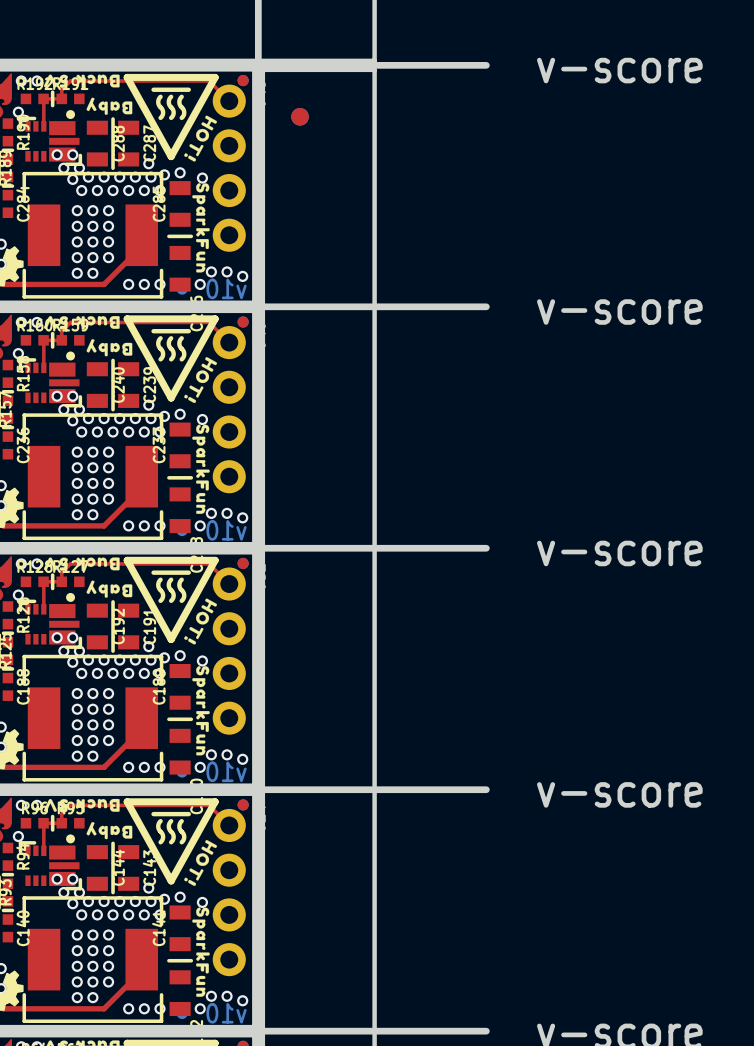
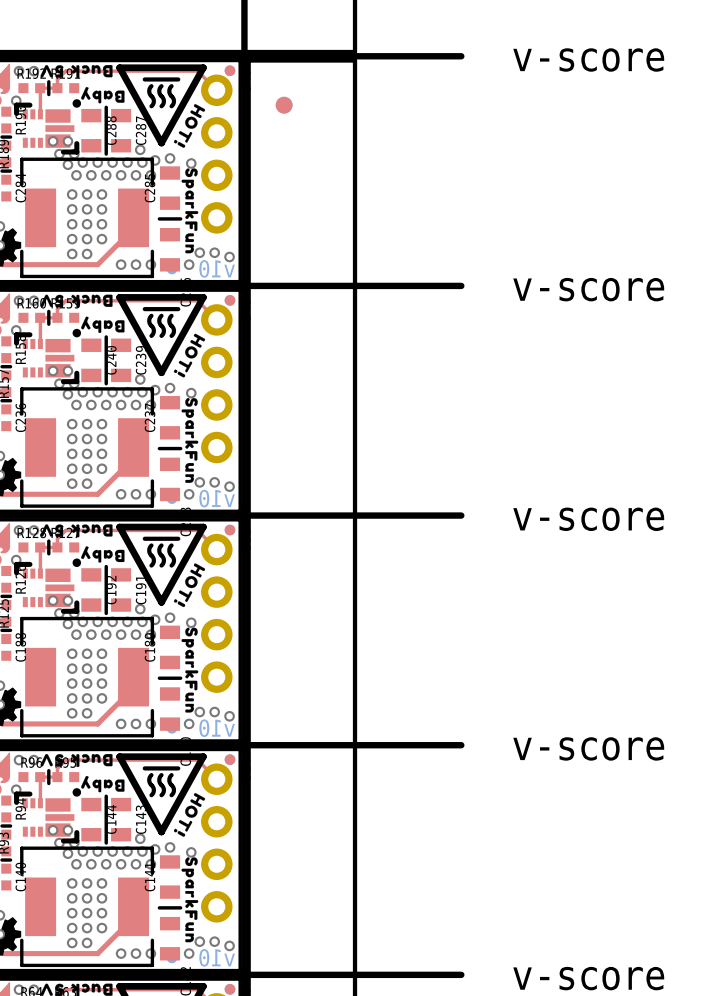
part footprint: [18, 110, 83, 167] -> [14, 99, 82, 155]
part footprint: [18, 351, 83, 408] -> [14, 328, 82, 385]
part footprint: [18, 592, 83, 649] -> [14, 558, 82, 614]
part footprint: [18, 834, 83, 891] -> [14, 788, 82, 844]

